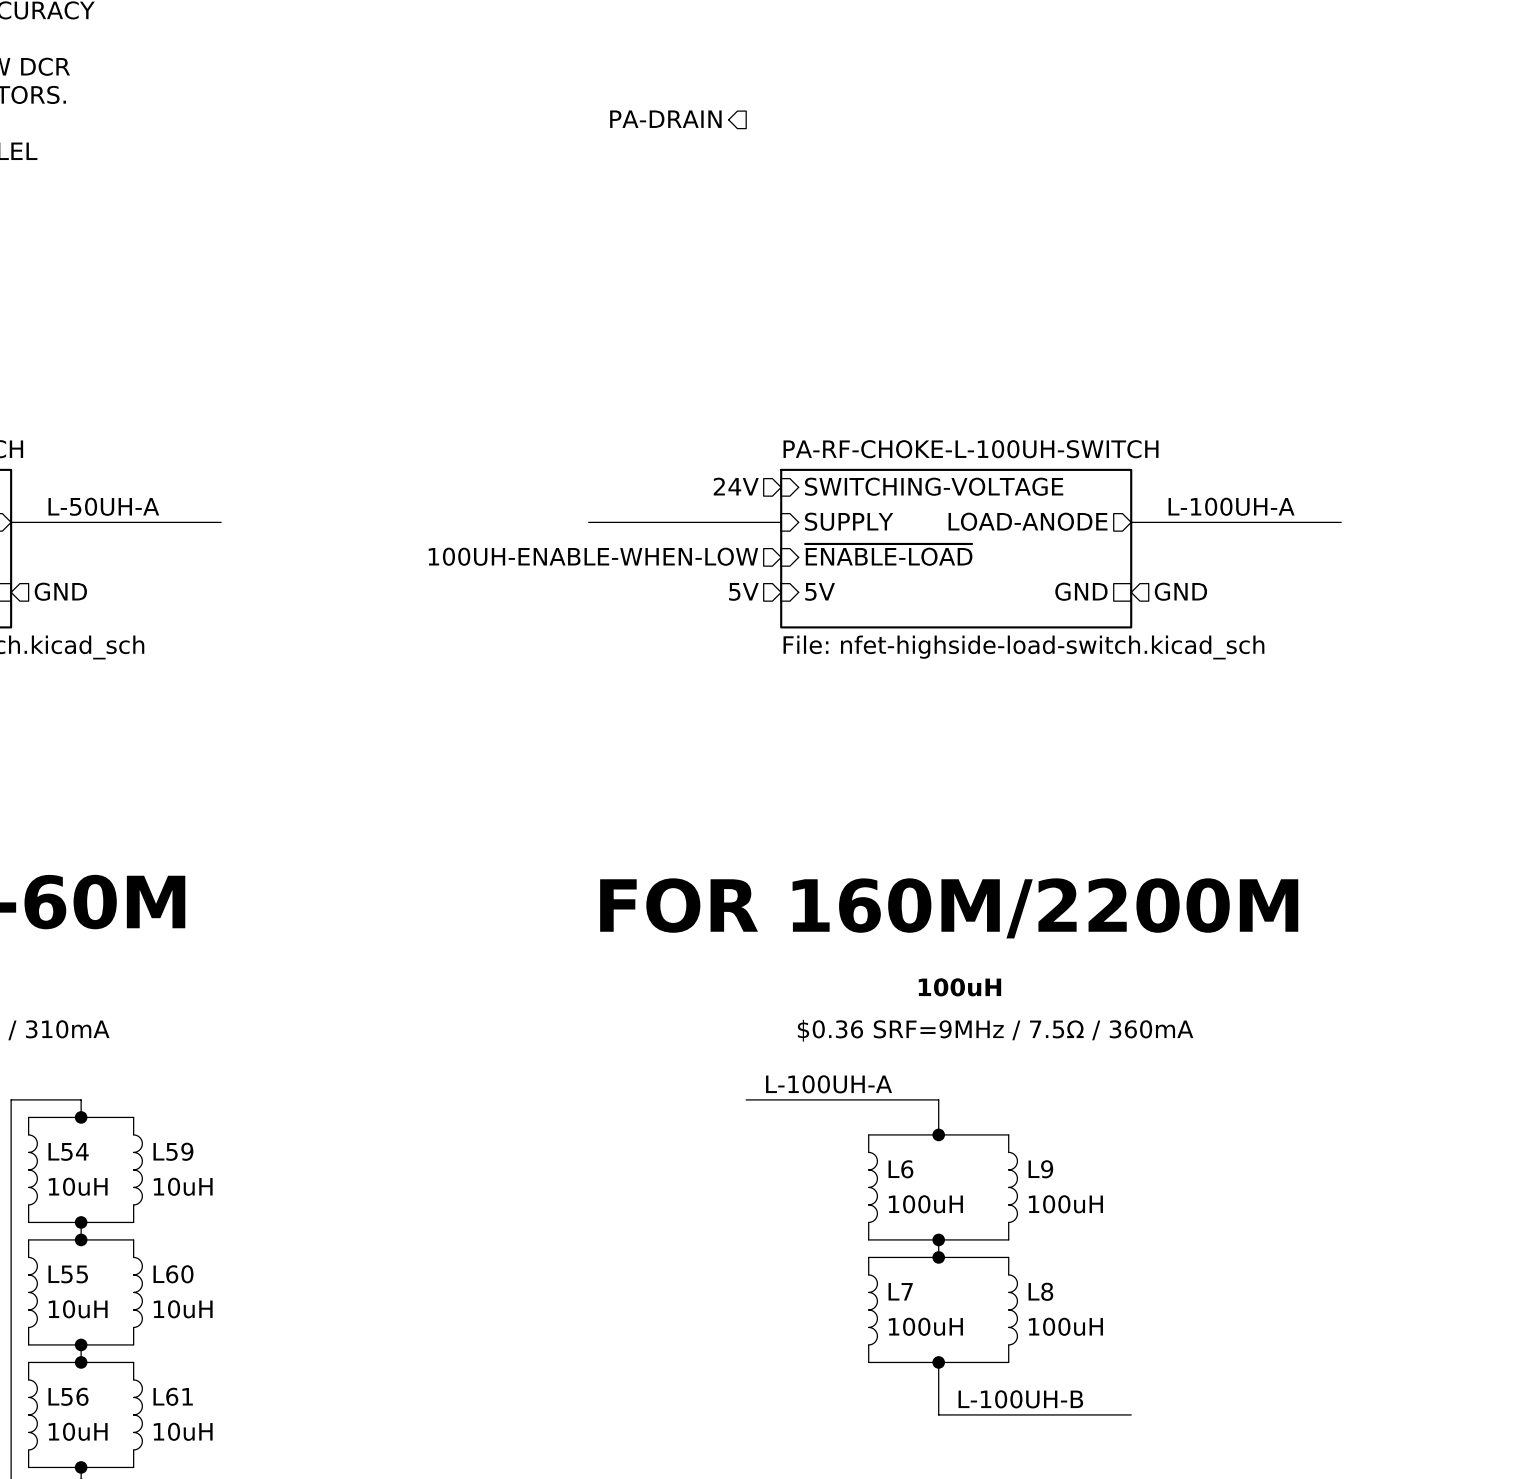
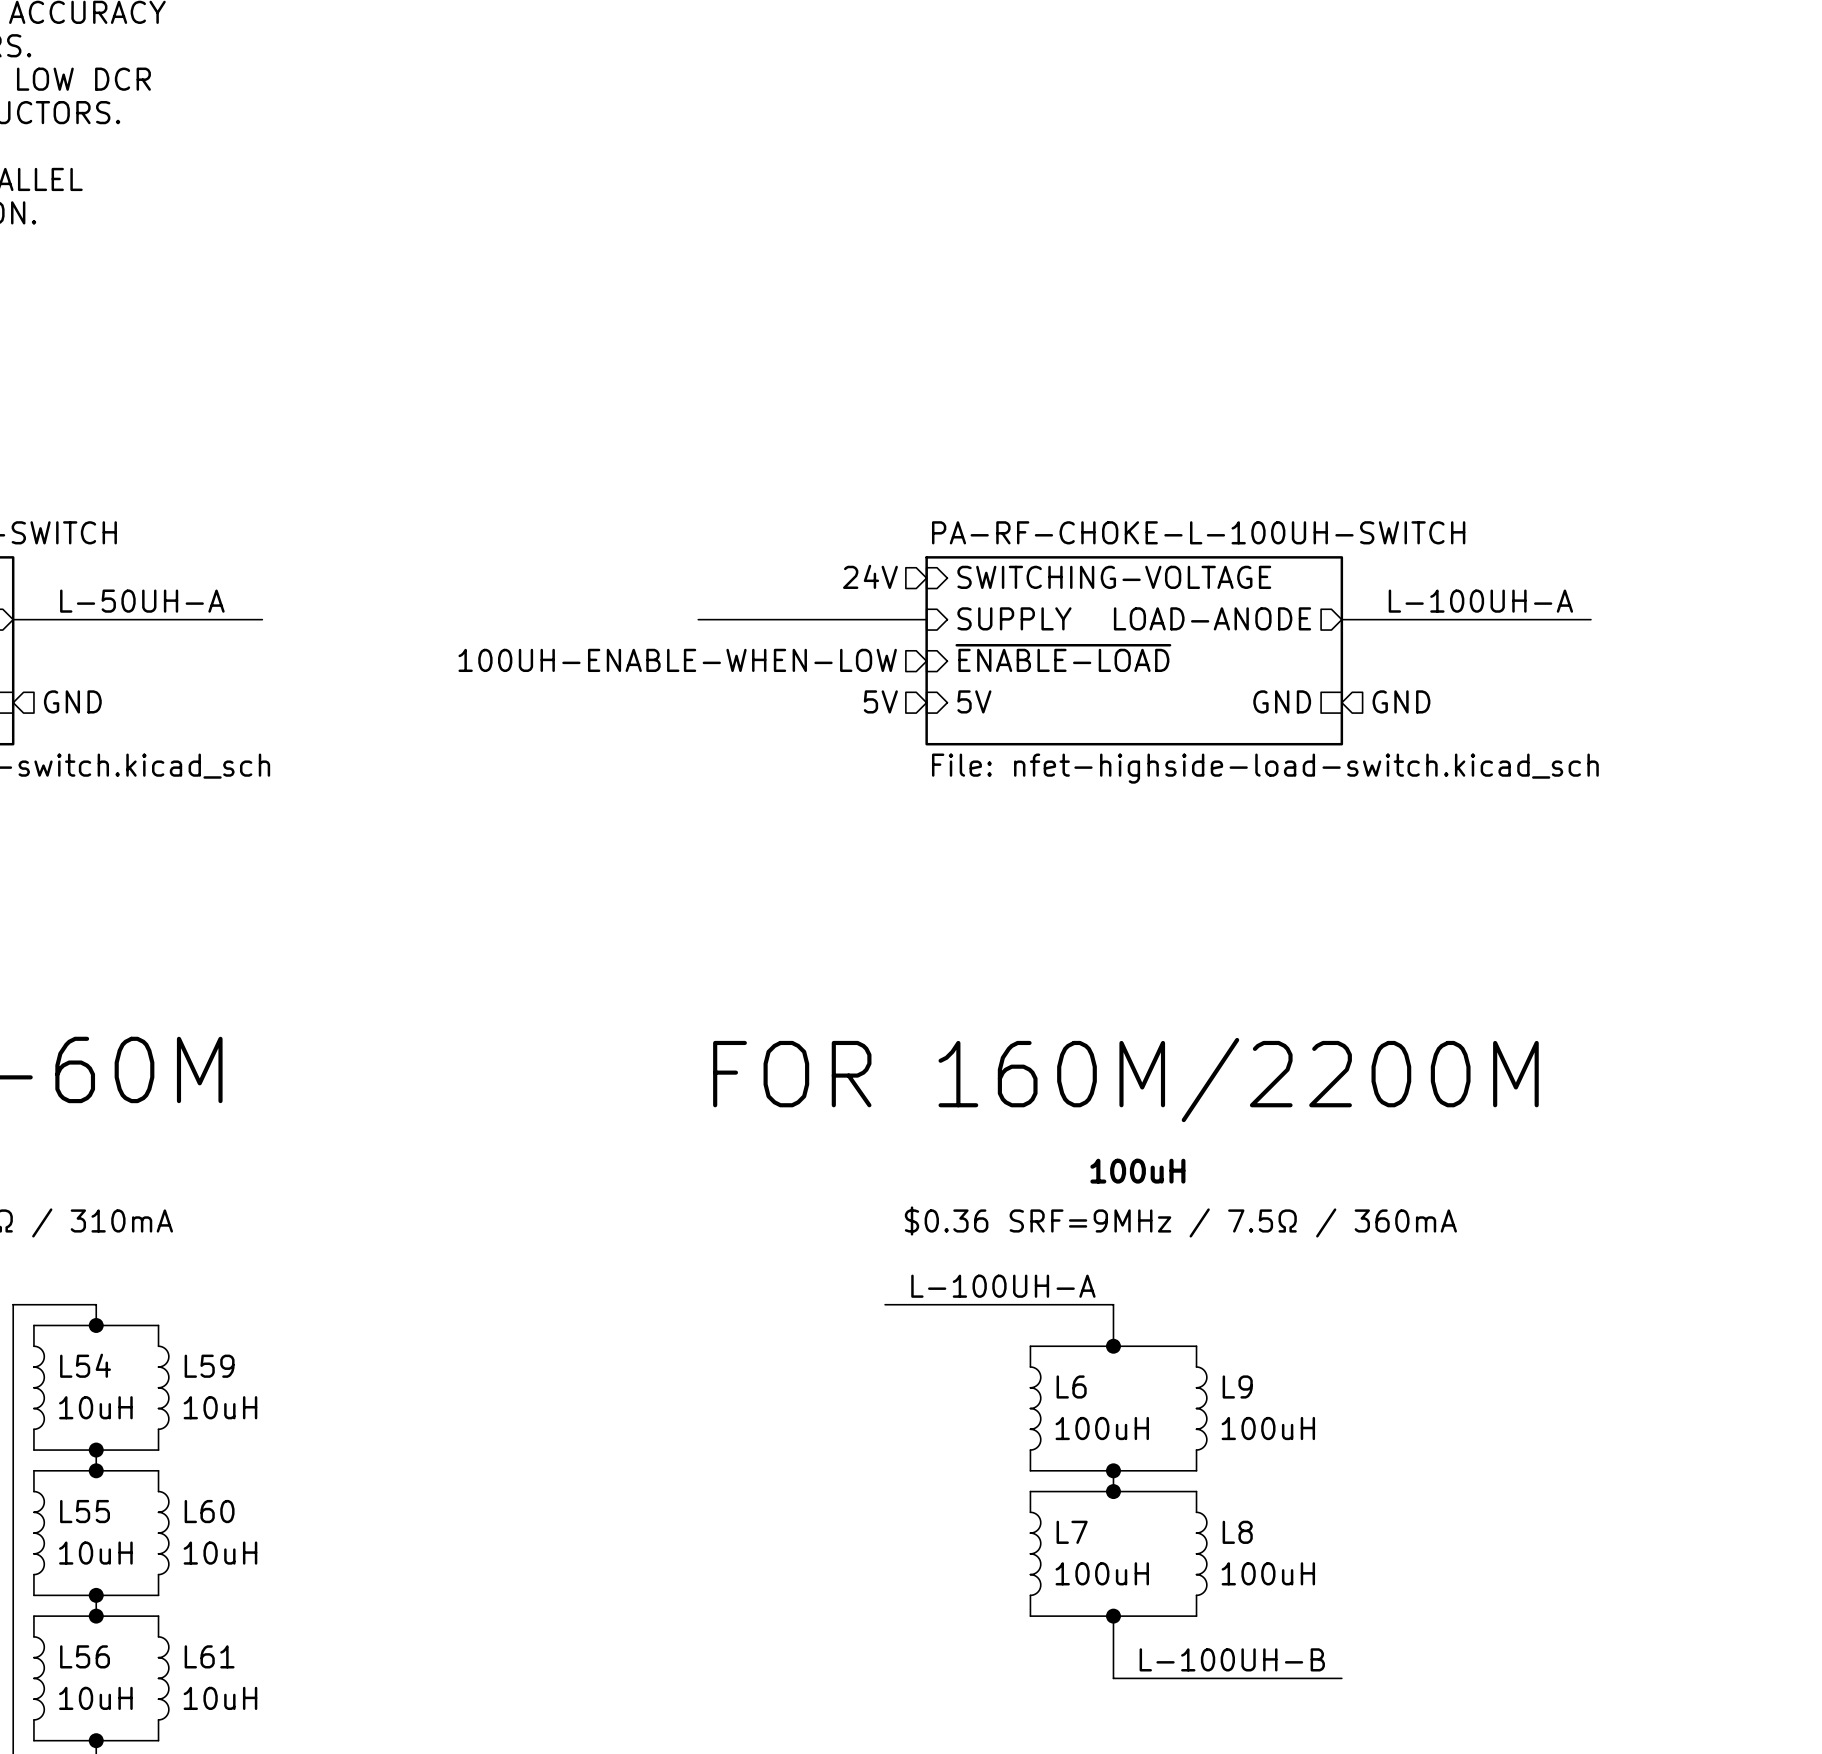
hierarchical label: PA-DRAIN (665, 119) -> none

